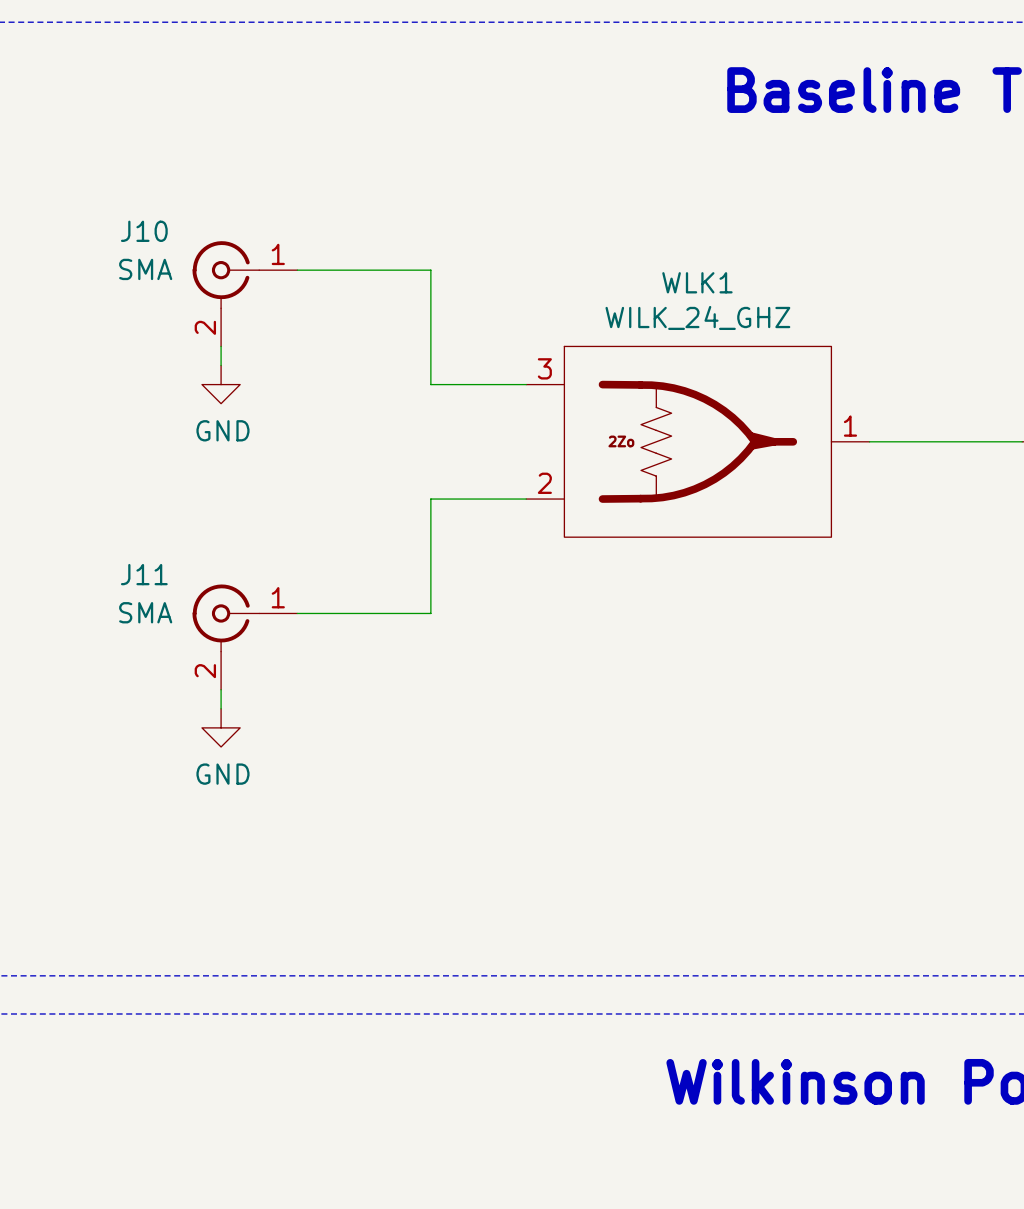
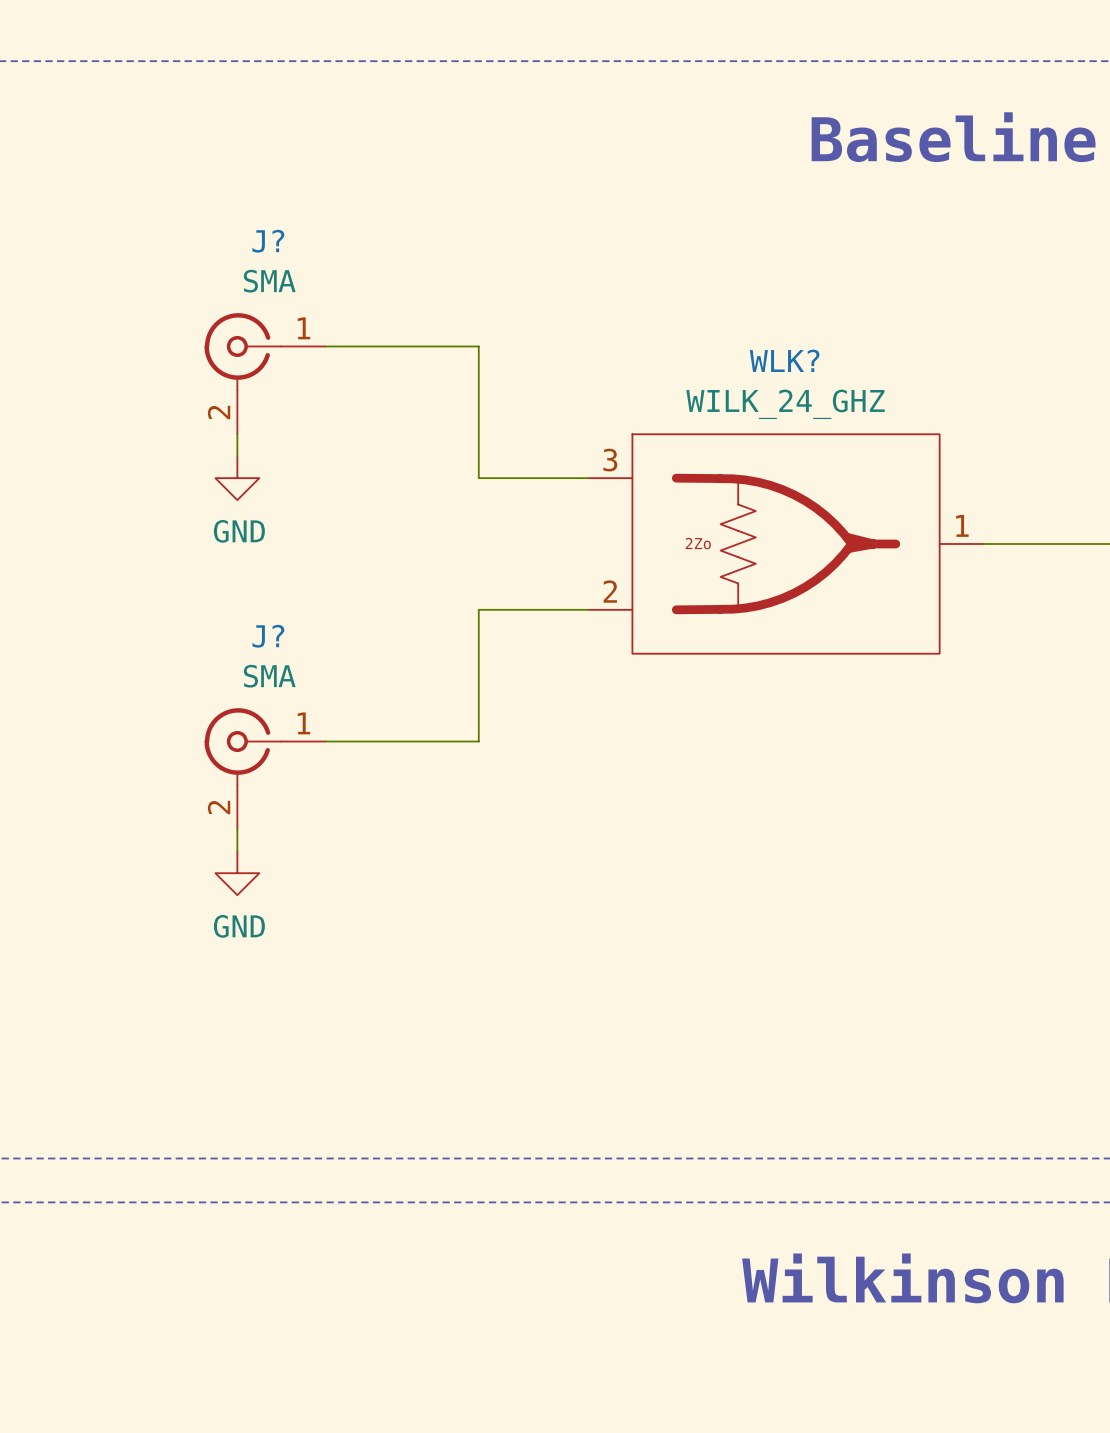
J10 name: J10 (144, 231) -> J? (268, 241)
J10 value position: SMA (145, 269) -> SMA (269, 281)
WLK1 name: WLK1 (697, 282) -> WLK? (784, 360)
J11 name: J11 (144, 574) -> J? (268, 636)
J11 value position: SMA (145, 612) -> SMA (269, 676)

